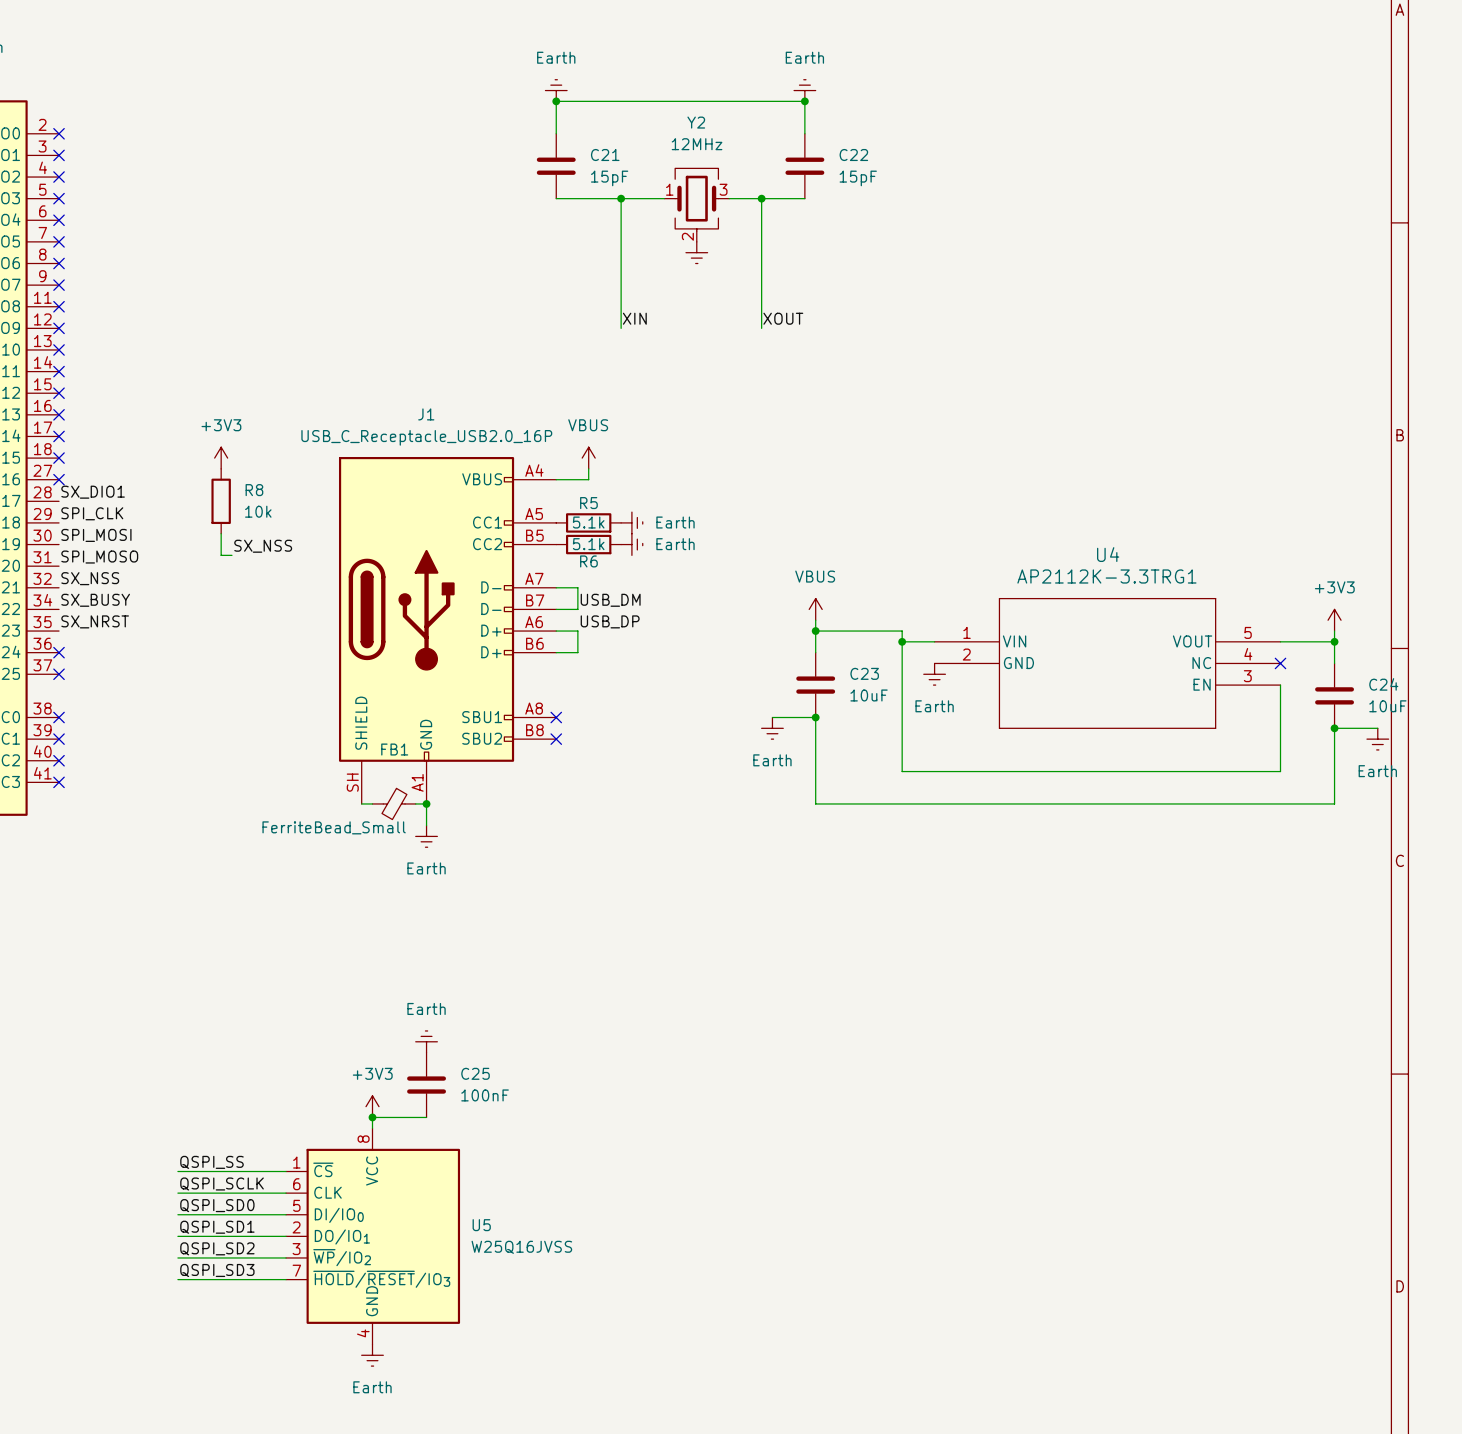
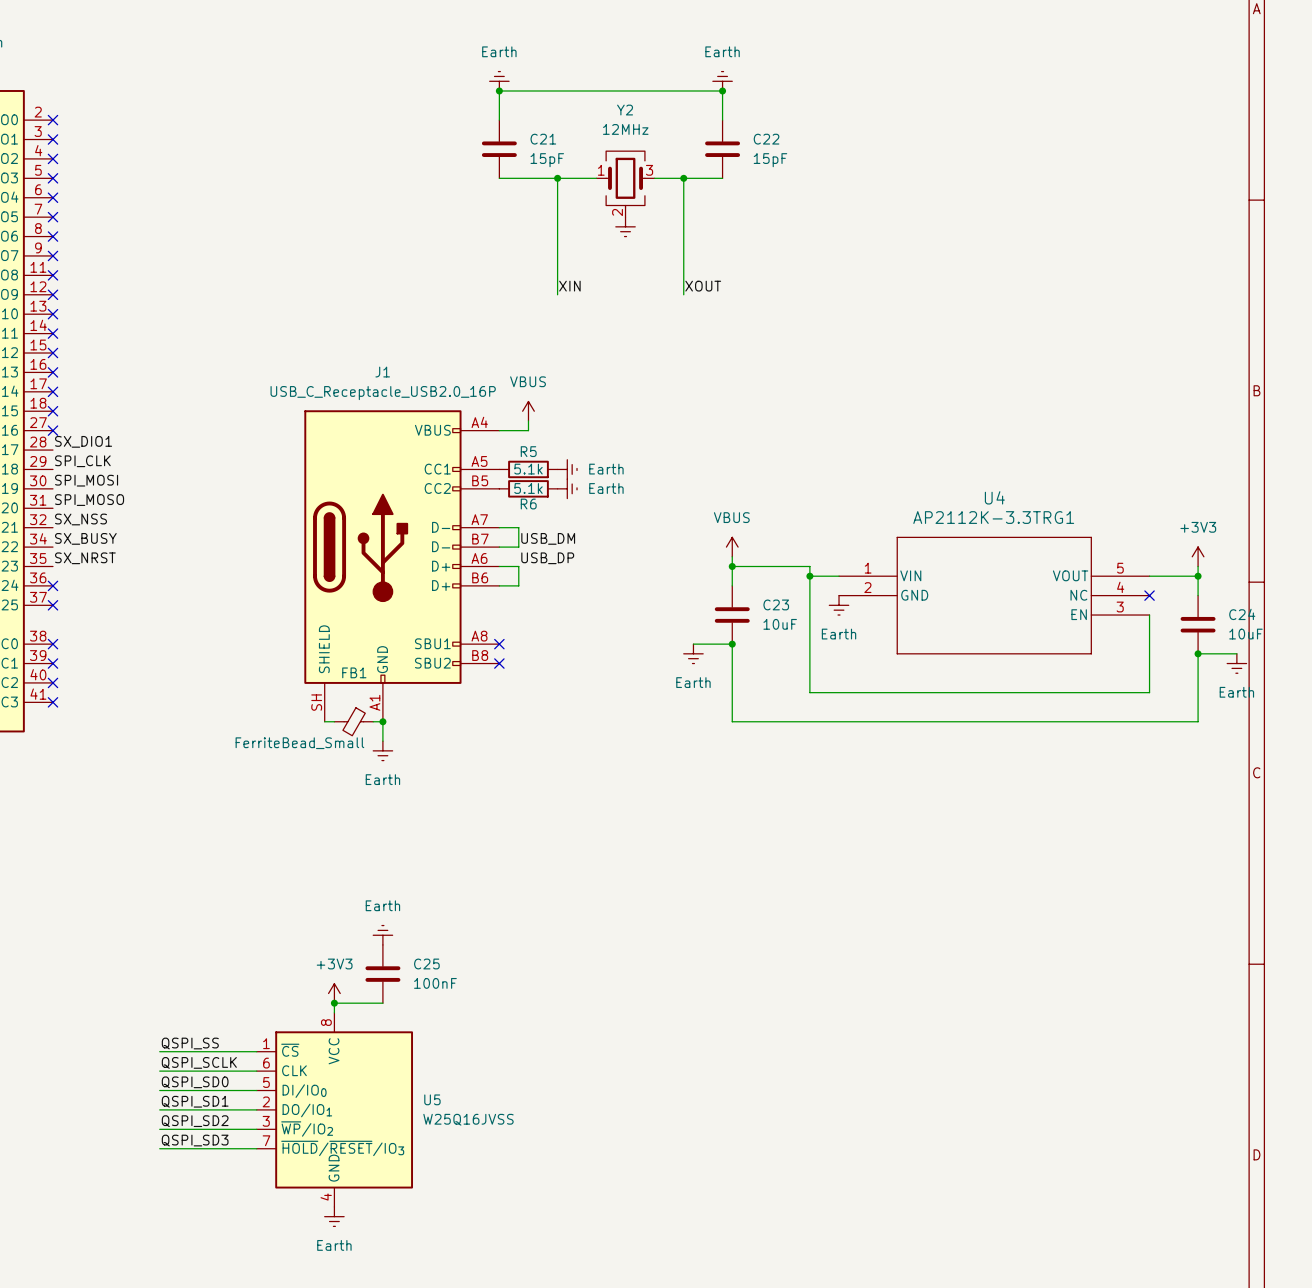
power symbol: +3V3 (221, 458) -> none
R8: 10k (221, 501) -> none
wire: (221, 533) (221, 555) (231, 555) -> none
label: SX_NSS (263, 546) -> none

